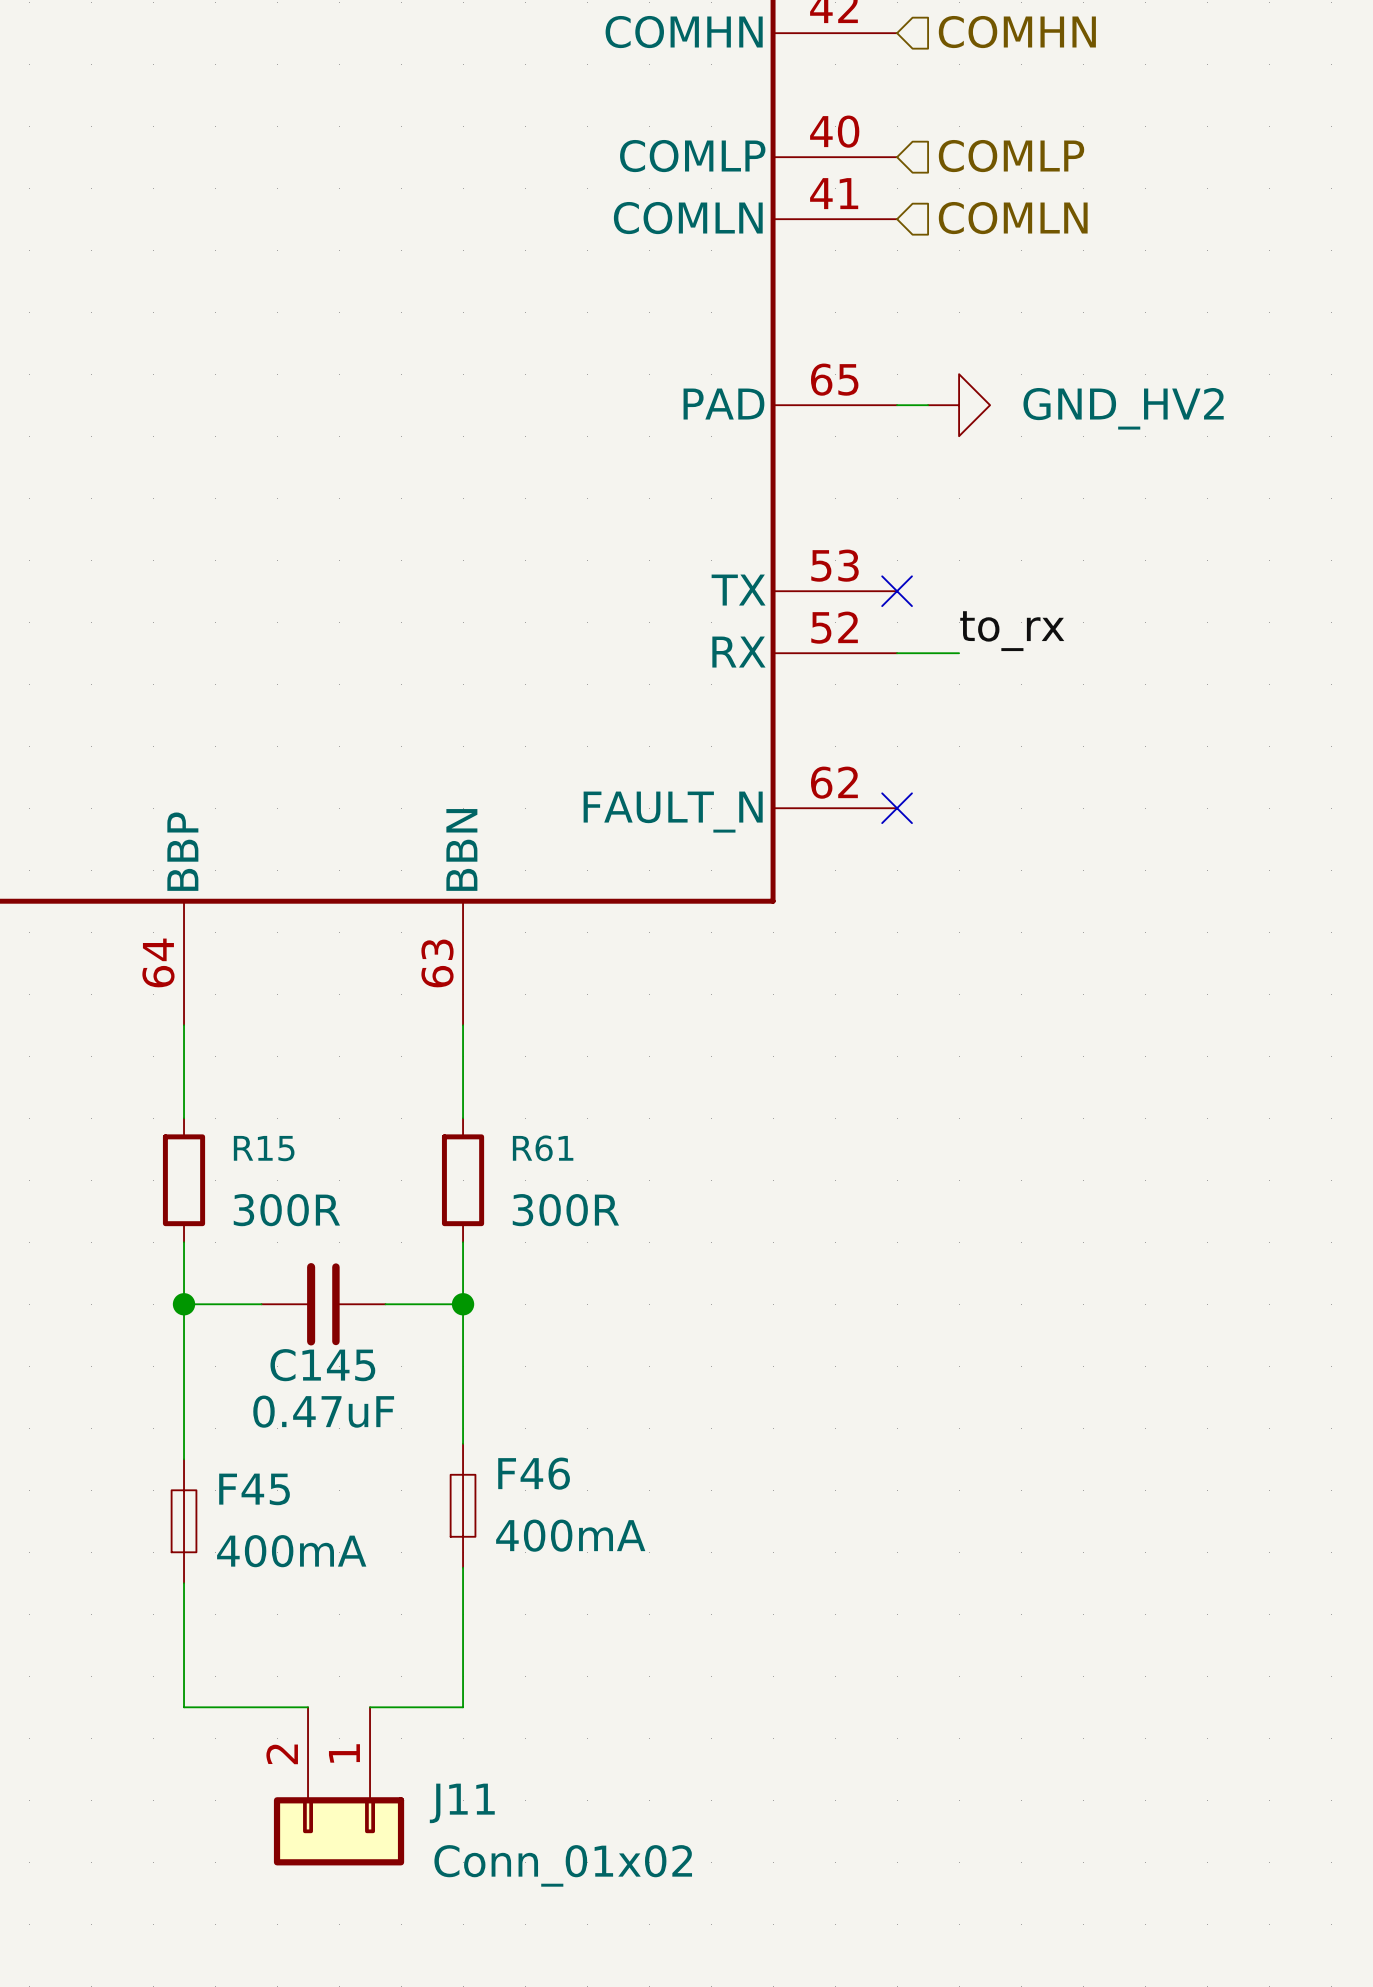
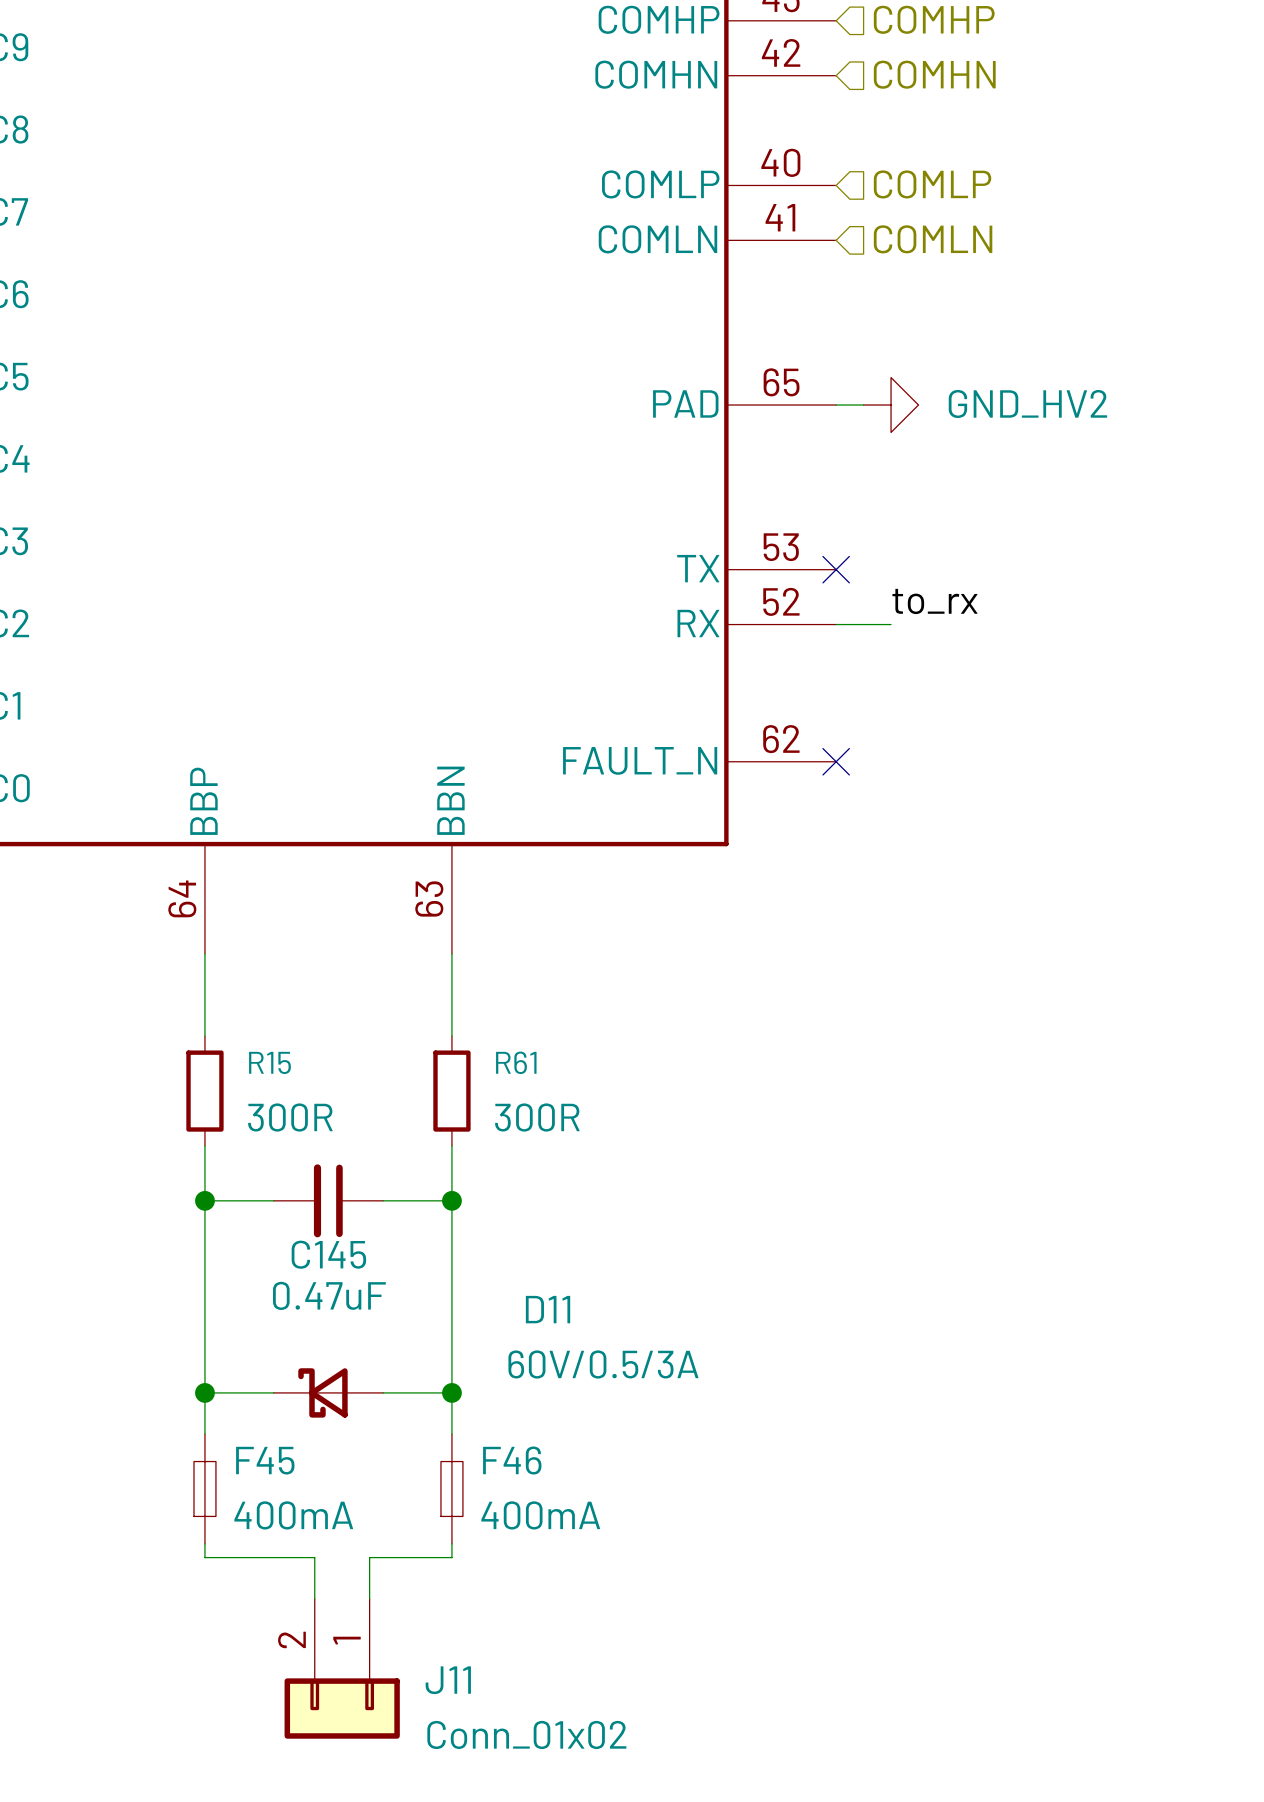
F46 position: (463, 1505) -> (451, 1488)
wire: none -> (204, 1392) (273, 1392)
F45 position: (184, 1521) -> (204, 1488)
junction: none -> (204, 1392)
D11: none -> 60V/0.5/3A (328, 1392)
wire: none -> (383, 1392) (451, 1392)
junction: none -> (451, 1392)
J11 position: (339, 1786) -> (342, 1668)

